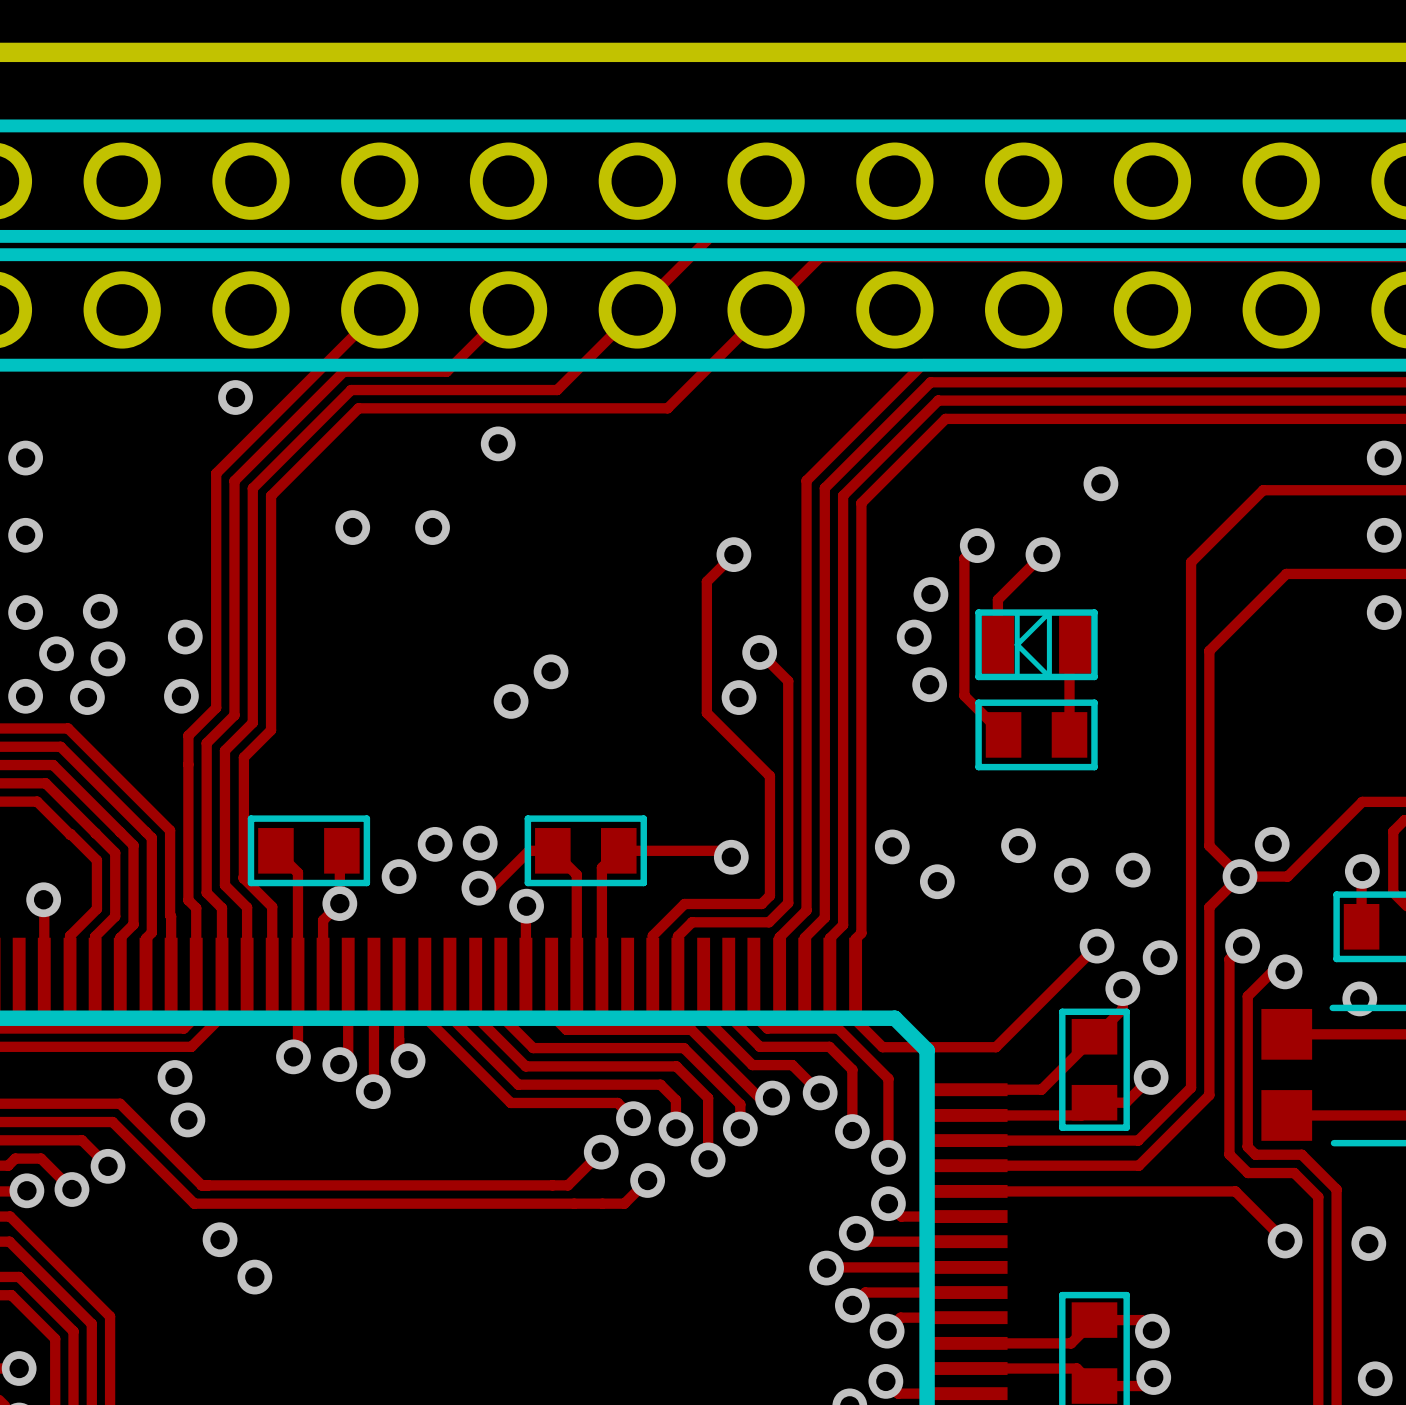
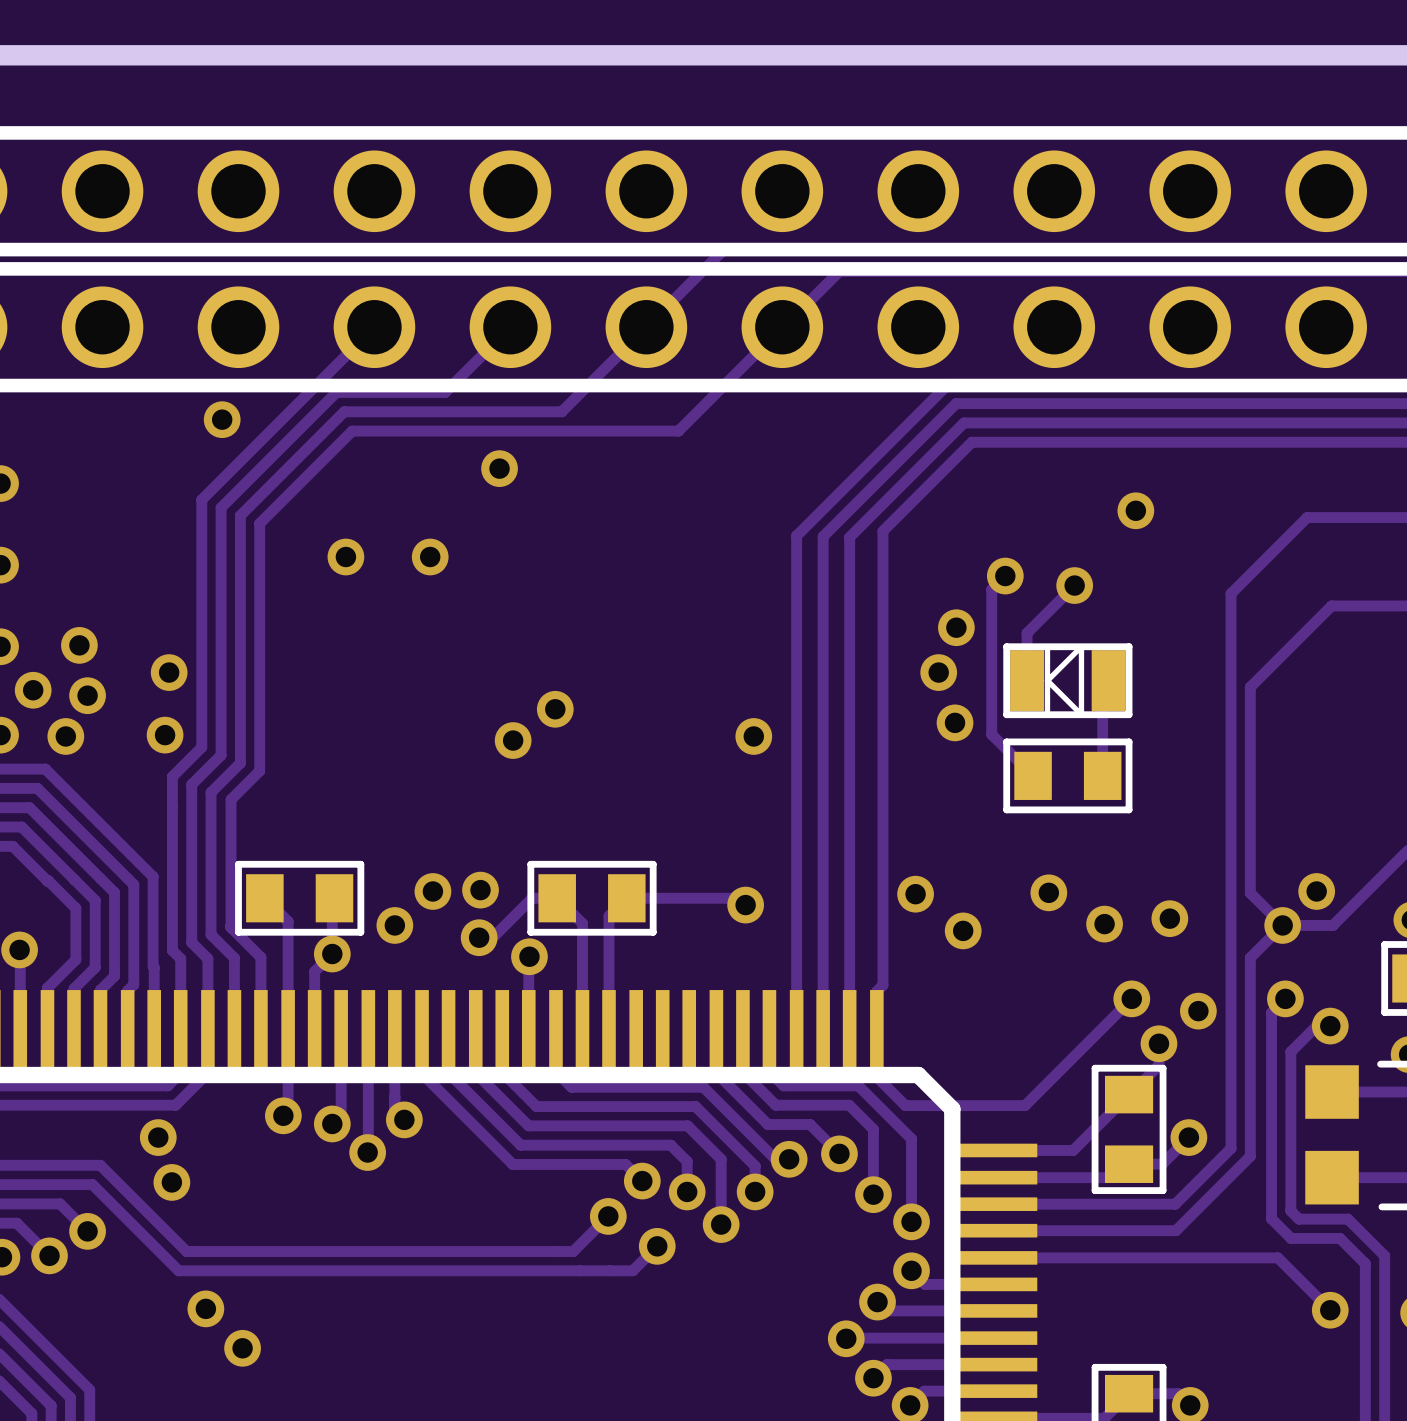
track: (938, 400) (843, 495) (843, 925) (829, 938) -> (963, 422) (849, 537) (849, 990)
track: (806, 480) (806, 910) (779, 937) -> (825, 507) (796, 535) (796, 989)
track: (824, 488) (824, 917) (804, 937) -> (844, 515) (823, 536) (823, 990)
track: (733, 554) (706, 581) (706, 713) (769, 776) (769, 895) (761, 904) (684, 904) (652, 935) (652, 976) -> none
via: (733, 554) -> none
track: (759, 652) (788, 681) (788, 903) (769, 922) (692, 922) (677, 936) (677, 976) -> none
via: (759, 652) -> none

